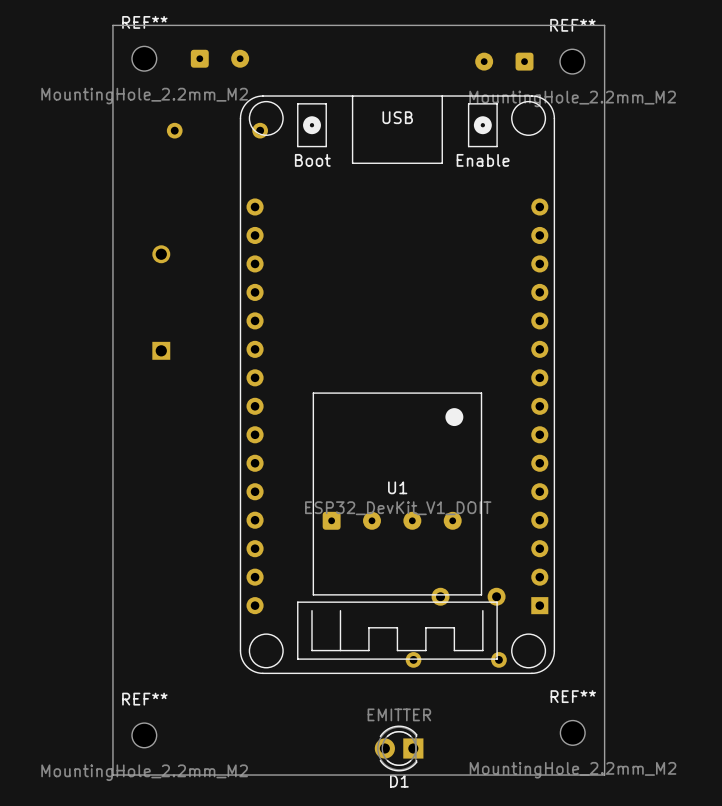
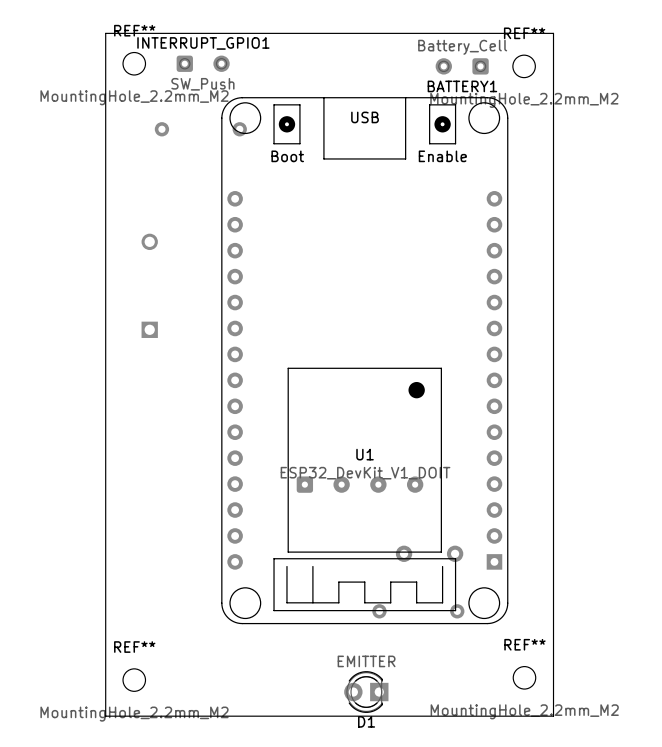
INTERRUPT_GPIO1 side: bottom (219, 58) -> top (203, 63)
BATTERY1 side: bottom (504, 61) -> top (462, 66)

